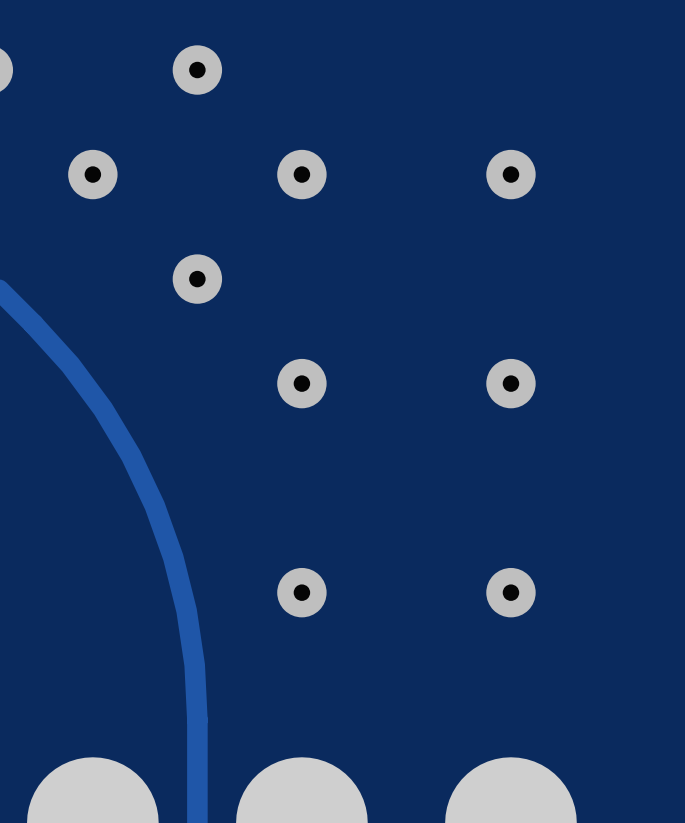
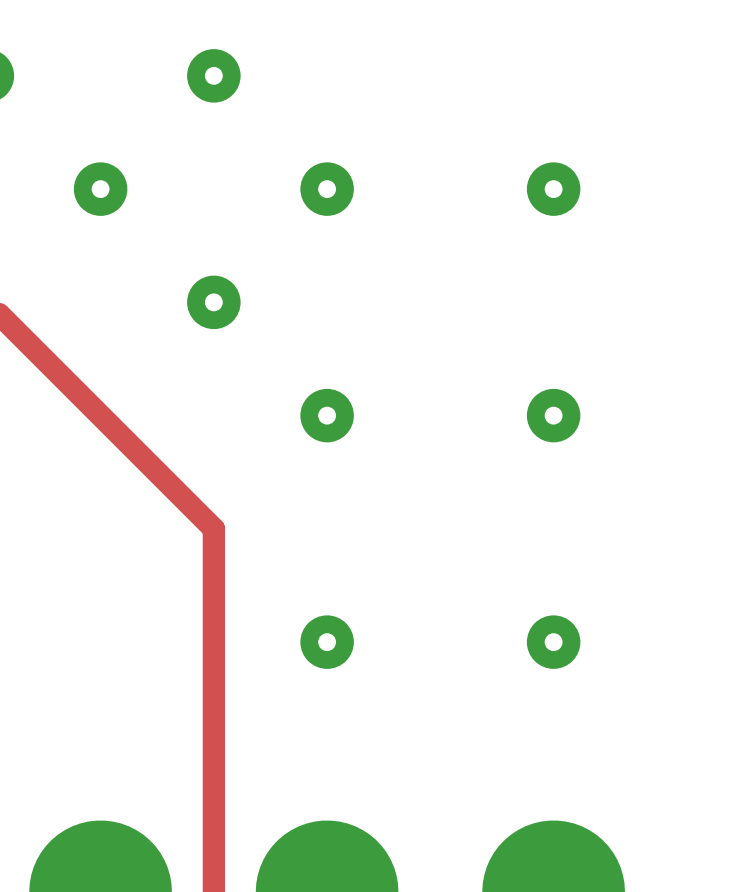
track: (33, 324) (70, 364) (103, 408) (131, 456) (154, 505) (173, 557) (186, 610) (194, 665) (197, 720) -> (36, 351) (213, 528) (213, 780)

